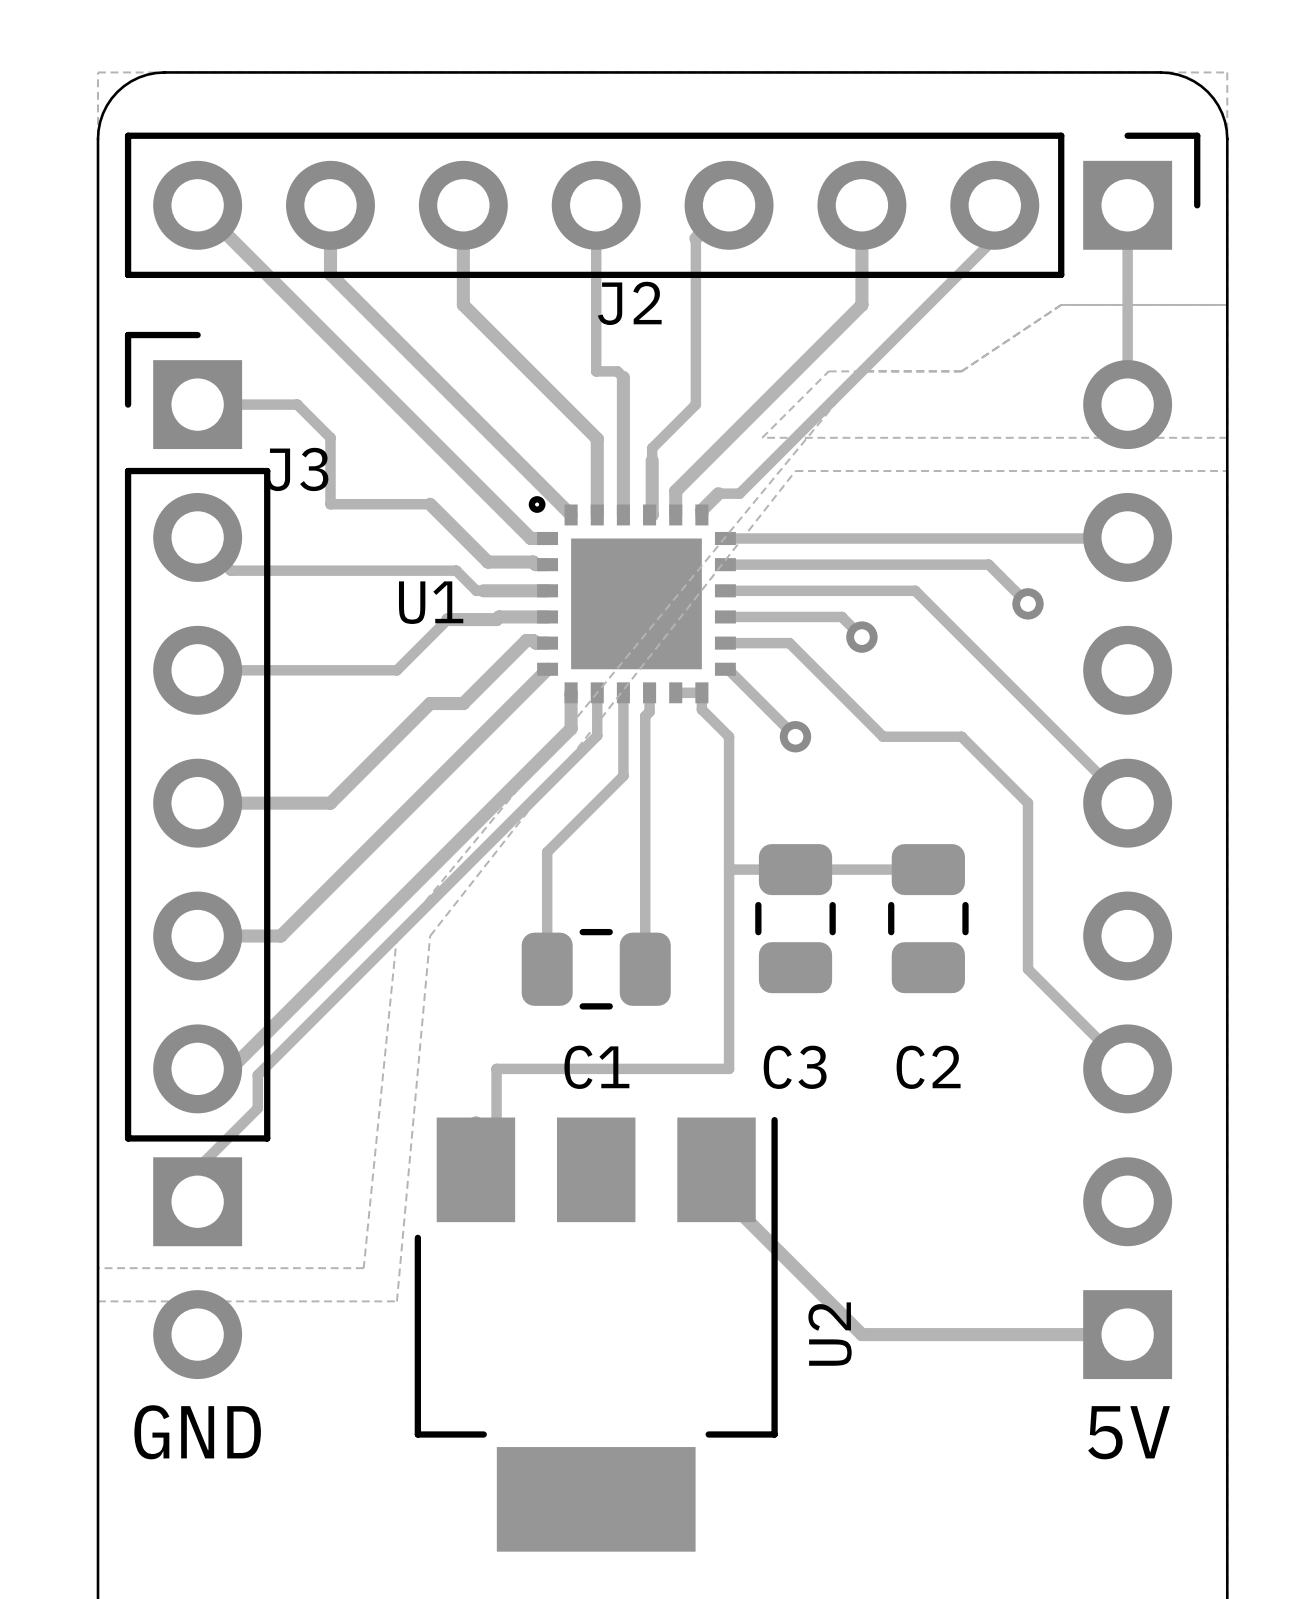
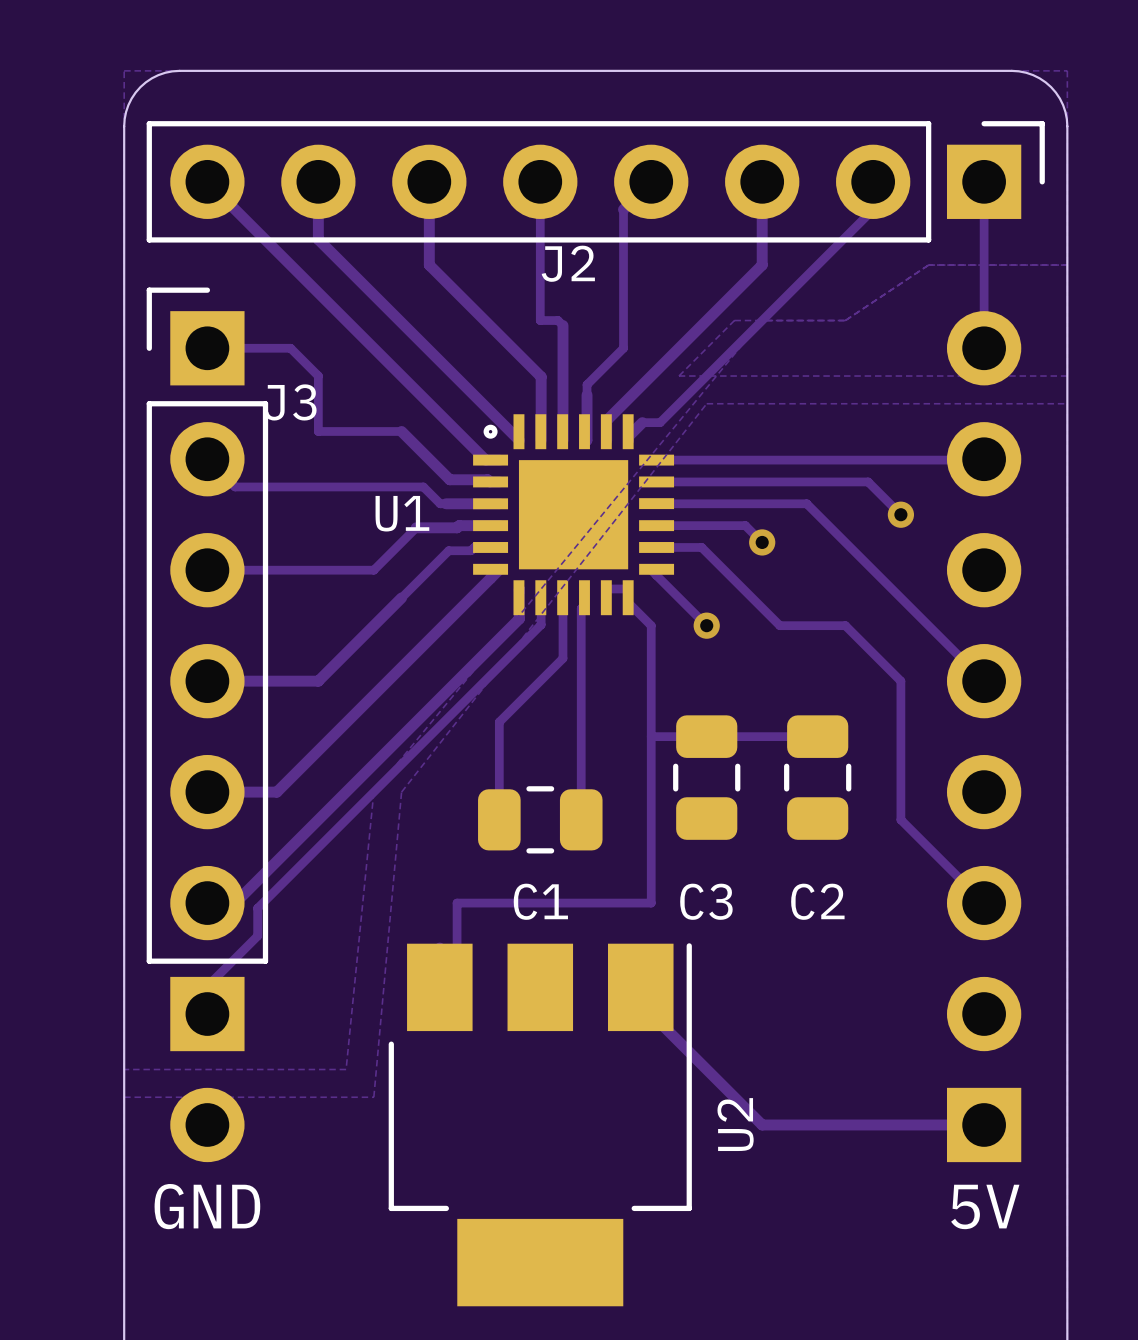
U1 footprint: [528, 496, 736, 704] -> [473, 414, 675, 616]
track: (535, 643) (533, 640) (526, 640) (463, 703) (430, 703) -> (489, 547) (474, 547) (470, 550) (448, 550) (401, 597)

